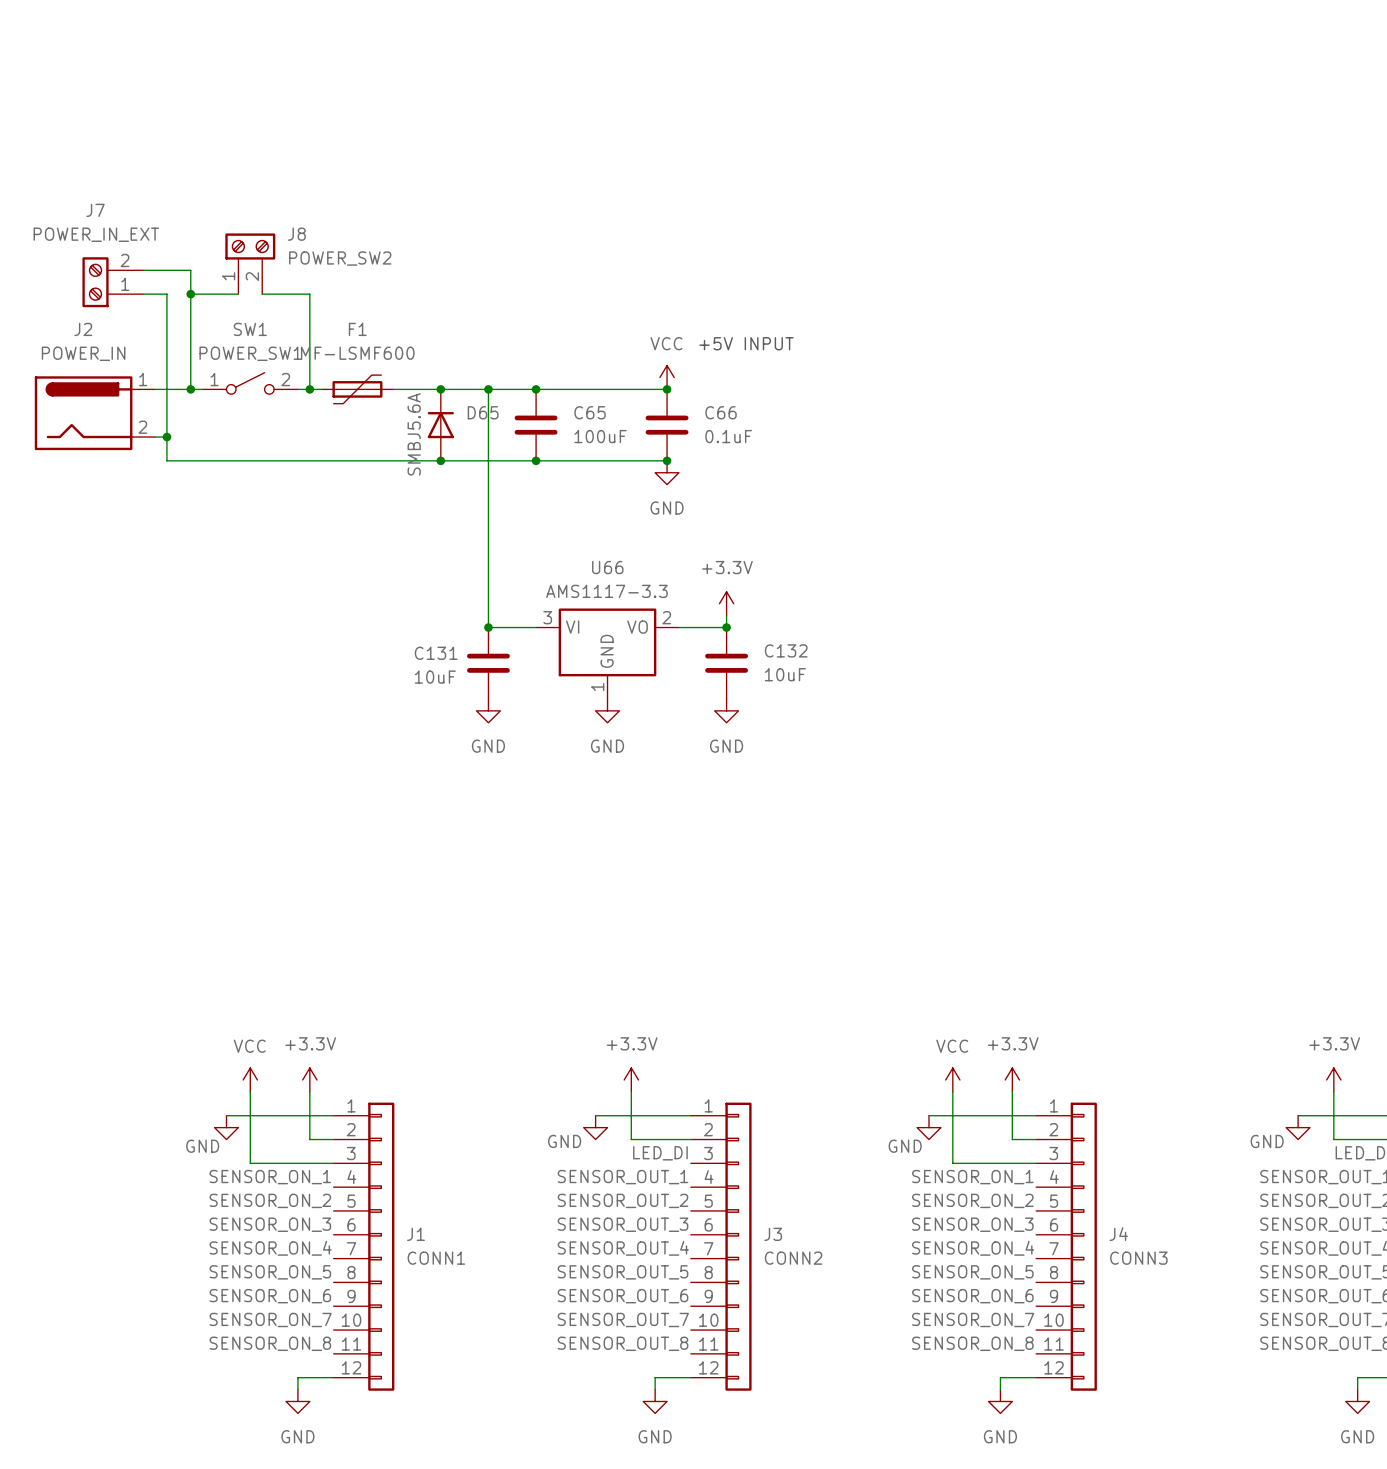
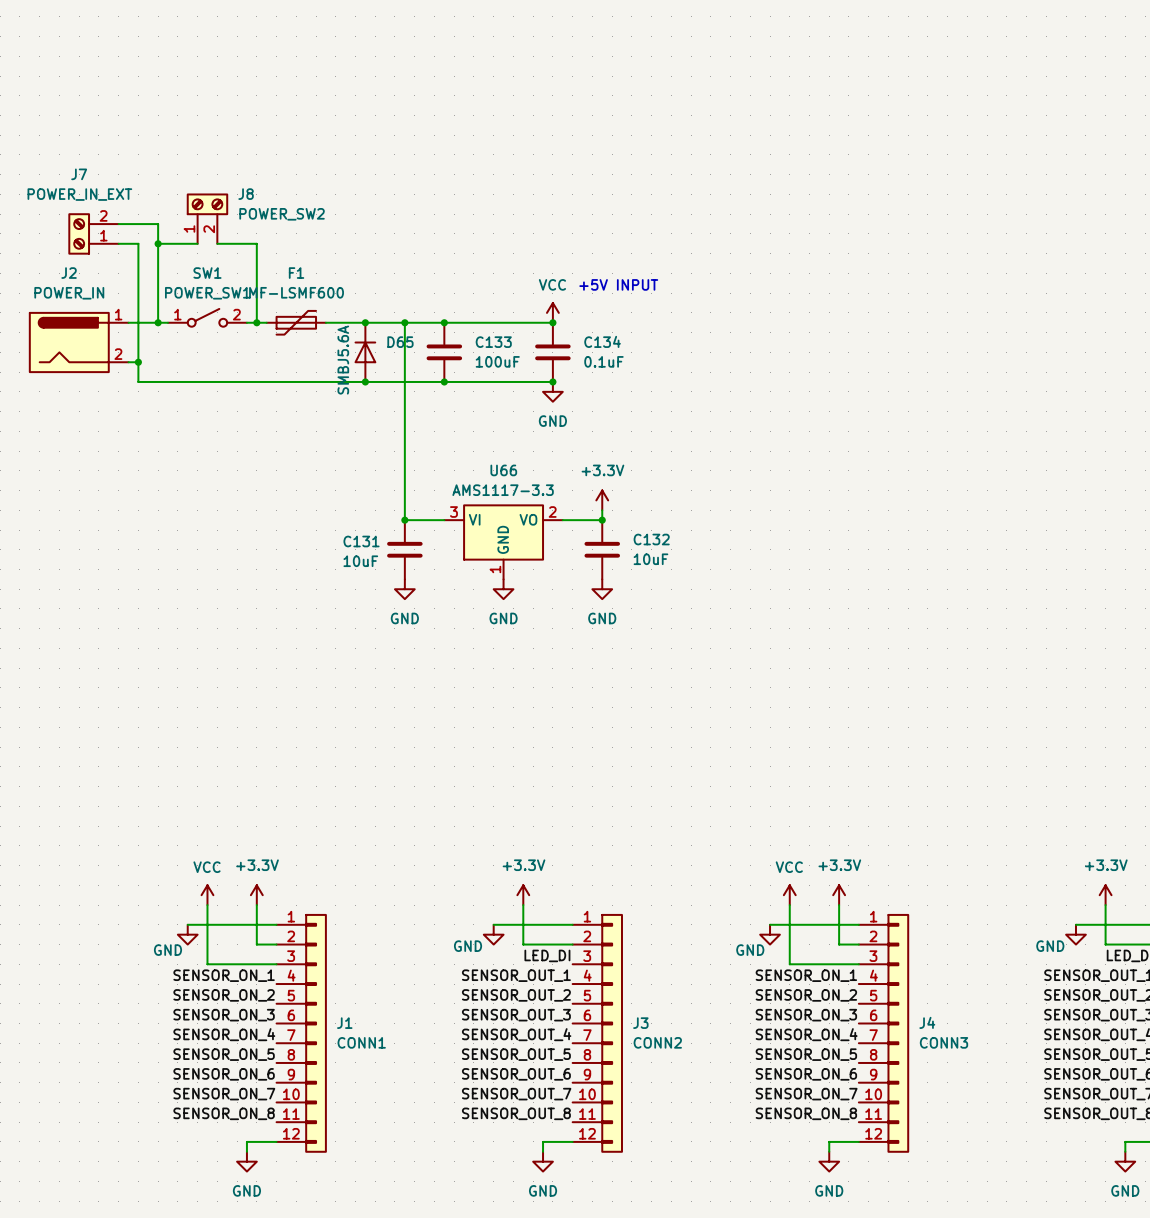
C65 name: C65 (590, 412) -> C133 (493, 342)
C66 name: C66 (721, 412) -> C134 (602, 341)

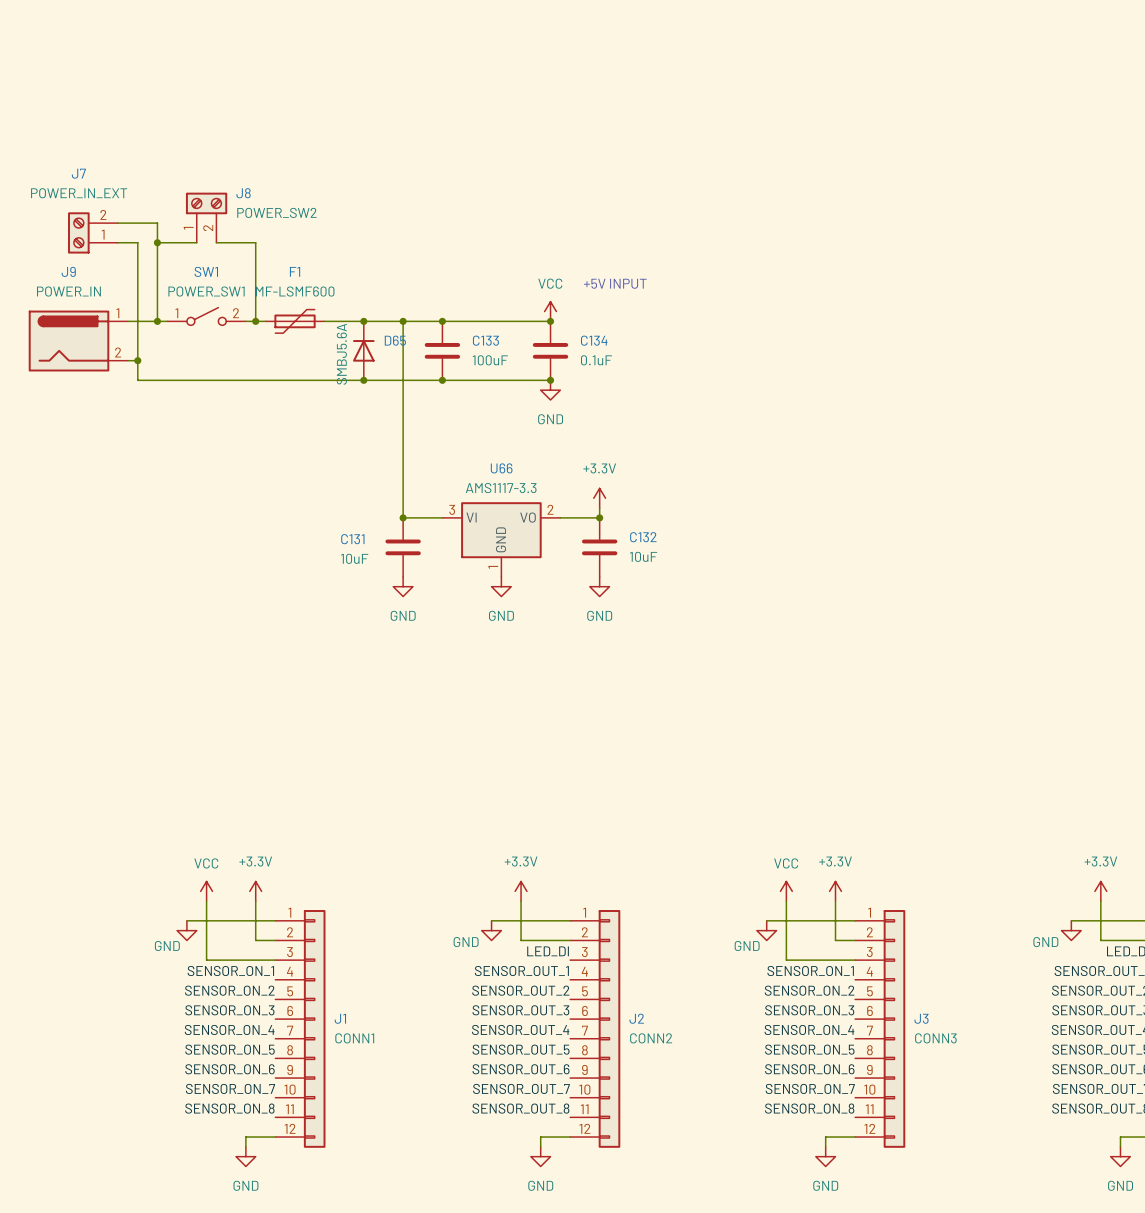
J2 name: J2 (69, 273) -> J9 (68, 271)
J4 name: J4 (927, 1022) -> J3 (921, 1018)
J3 name: J3 (640, 1023) -> J2 (636, 1018)

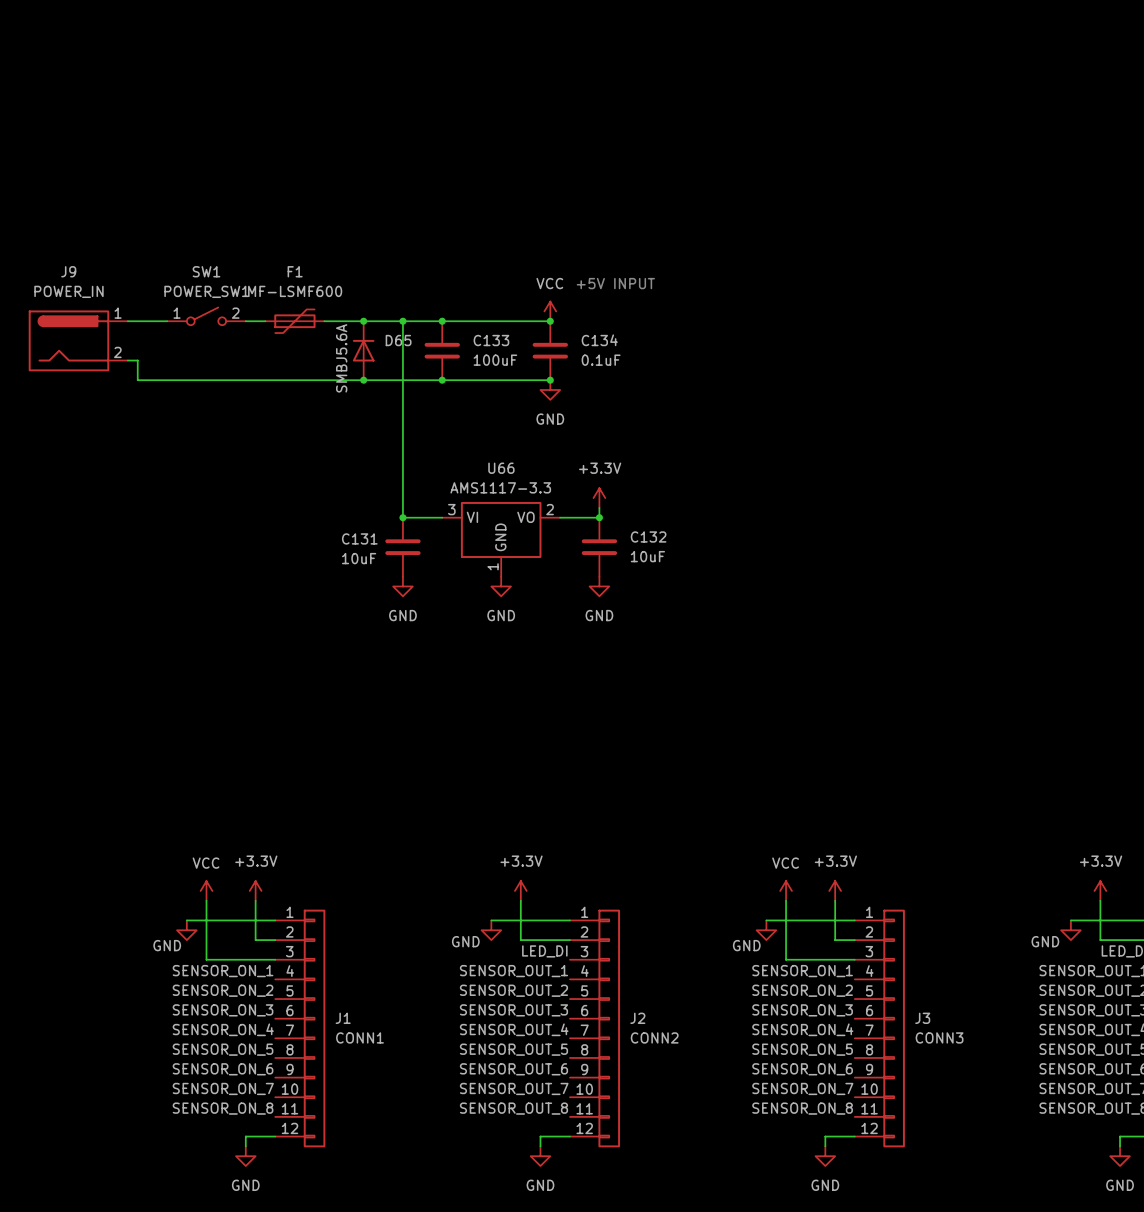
J8: POWER_SW2 (206, 217) -> none
wire: (118, 223) (157, 223) (157, 321) -> none
J7: POWER_IN_EXT (93, 232) -> none
wire: (118, 242) (137, 242) (137, 360) -> none
wire: (157, 242) (196, 242) -> none
junction: (157, 242) -> none
wire: (216, 242) (255, 242) (255, 321) -> none
junction: (157, 321) -> none
junction: (255, 321) -> none
junction: (137, 360) -> none

